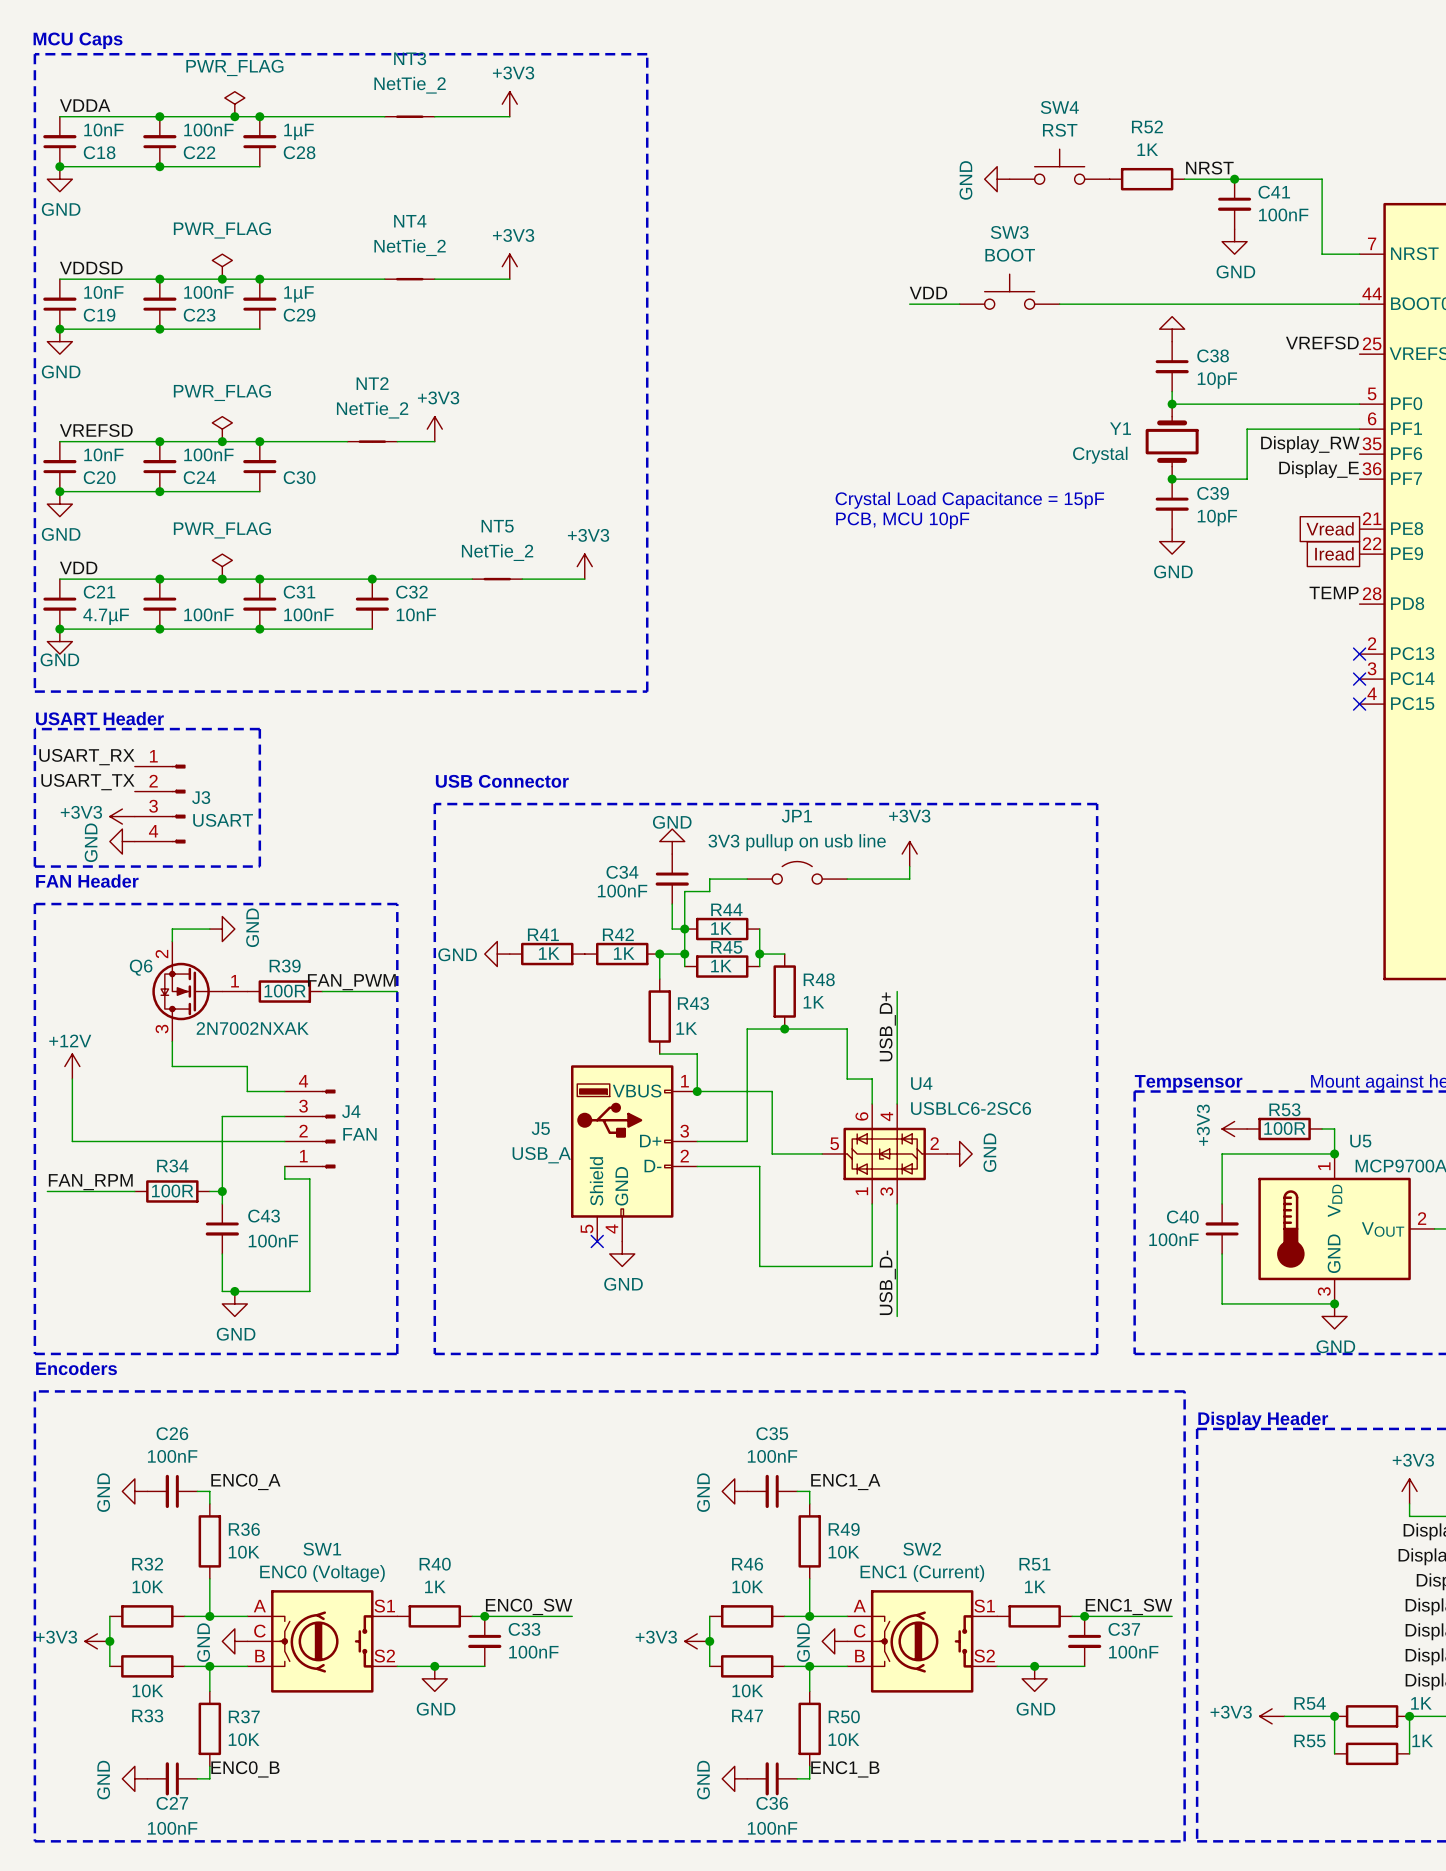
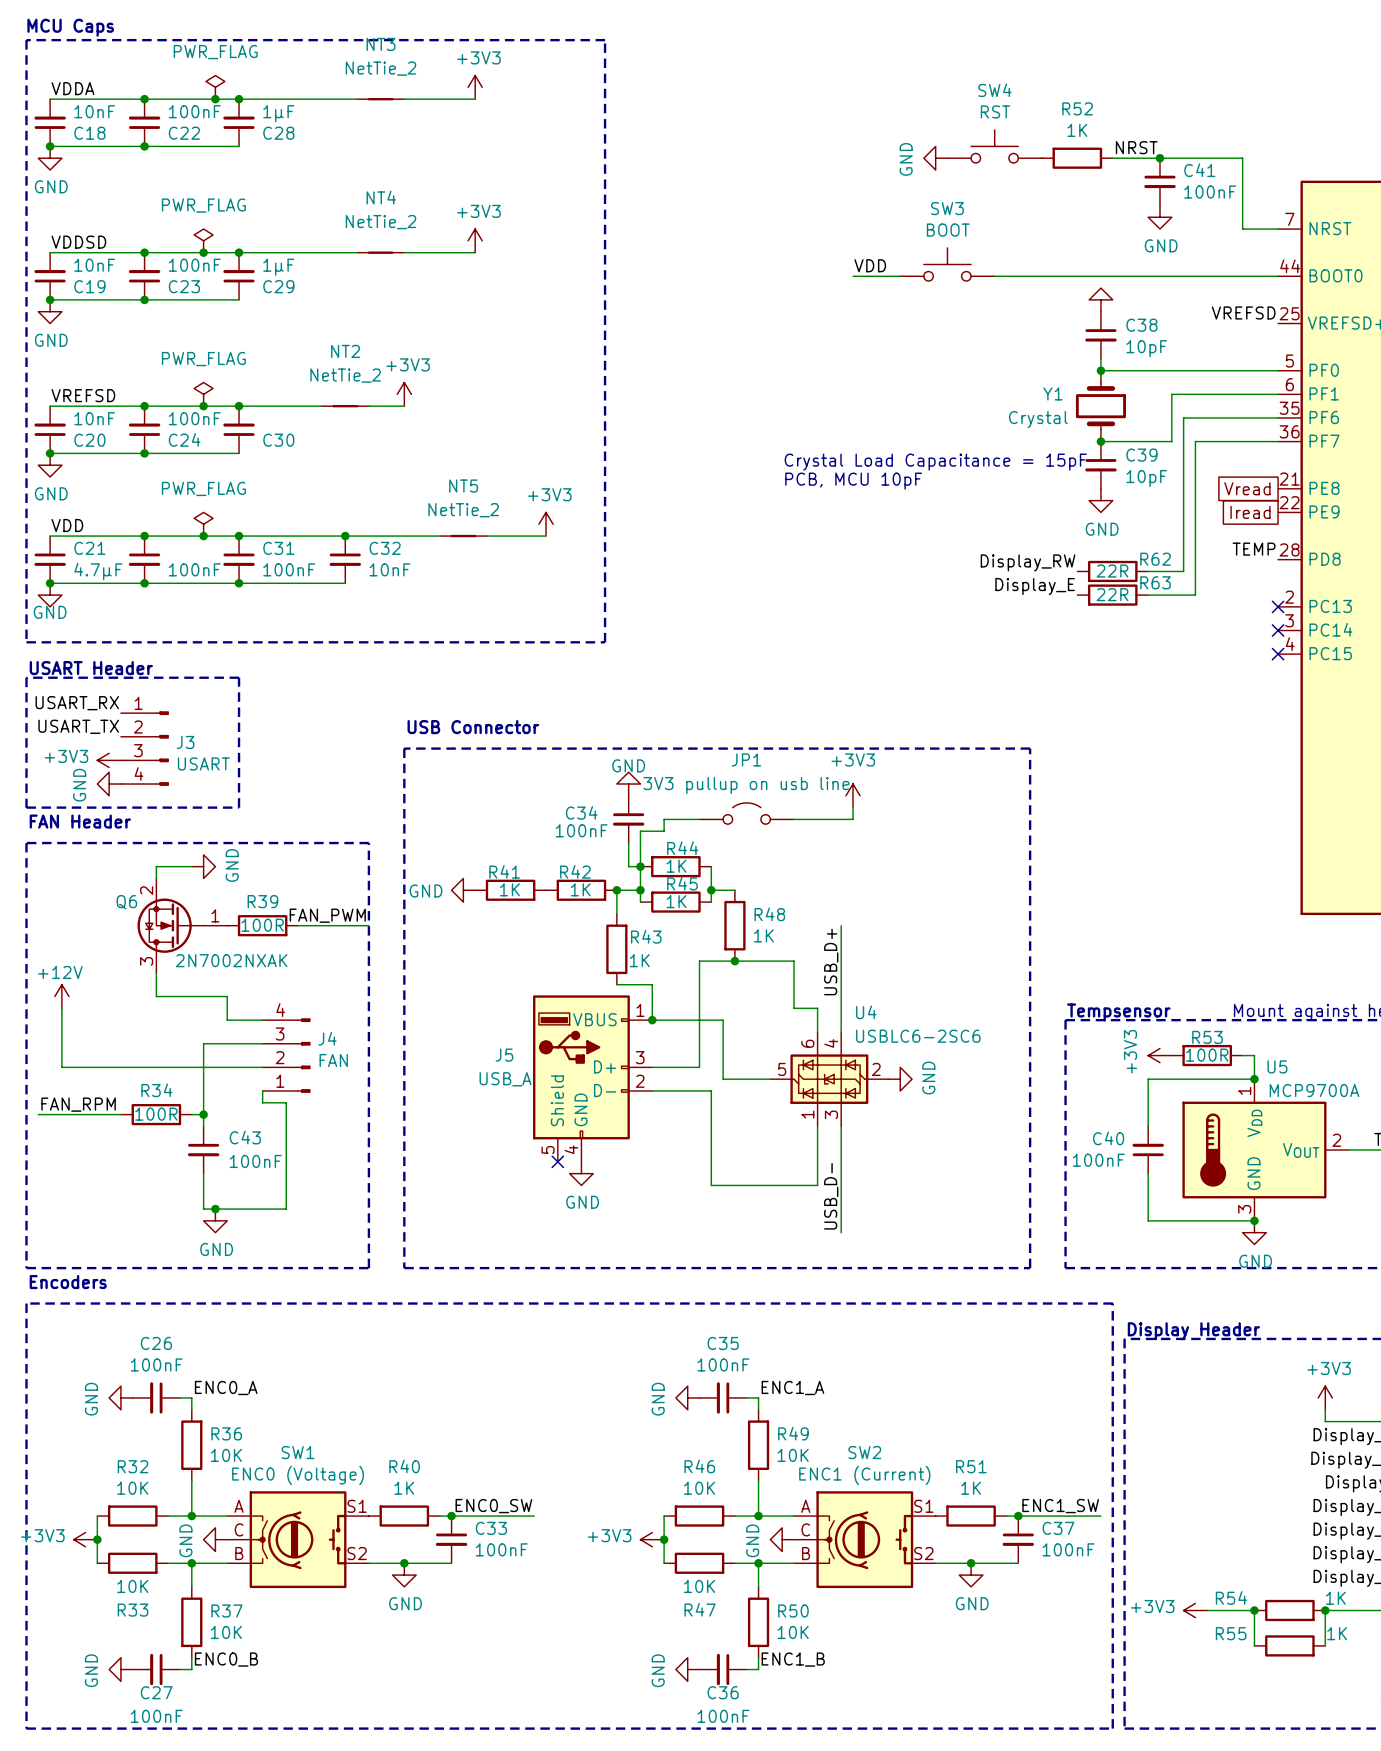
label: Display_RW (1310, 444) -> none
wire: none -> (1278, 417) (1183, 417) (1183, 571) (1148, 571)
label: Display_E (1319, 469) -> none
wire: none -> (1278, 441) (1195, 441) (1195, 595) (1148, 595)
label: none -> Display_RW (1028, 562)
R62: none -> 22R (1112, 571)
label: none -> Display_E (1035, 586)
R63: none -> 22R (1112, 595)

